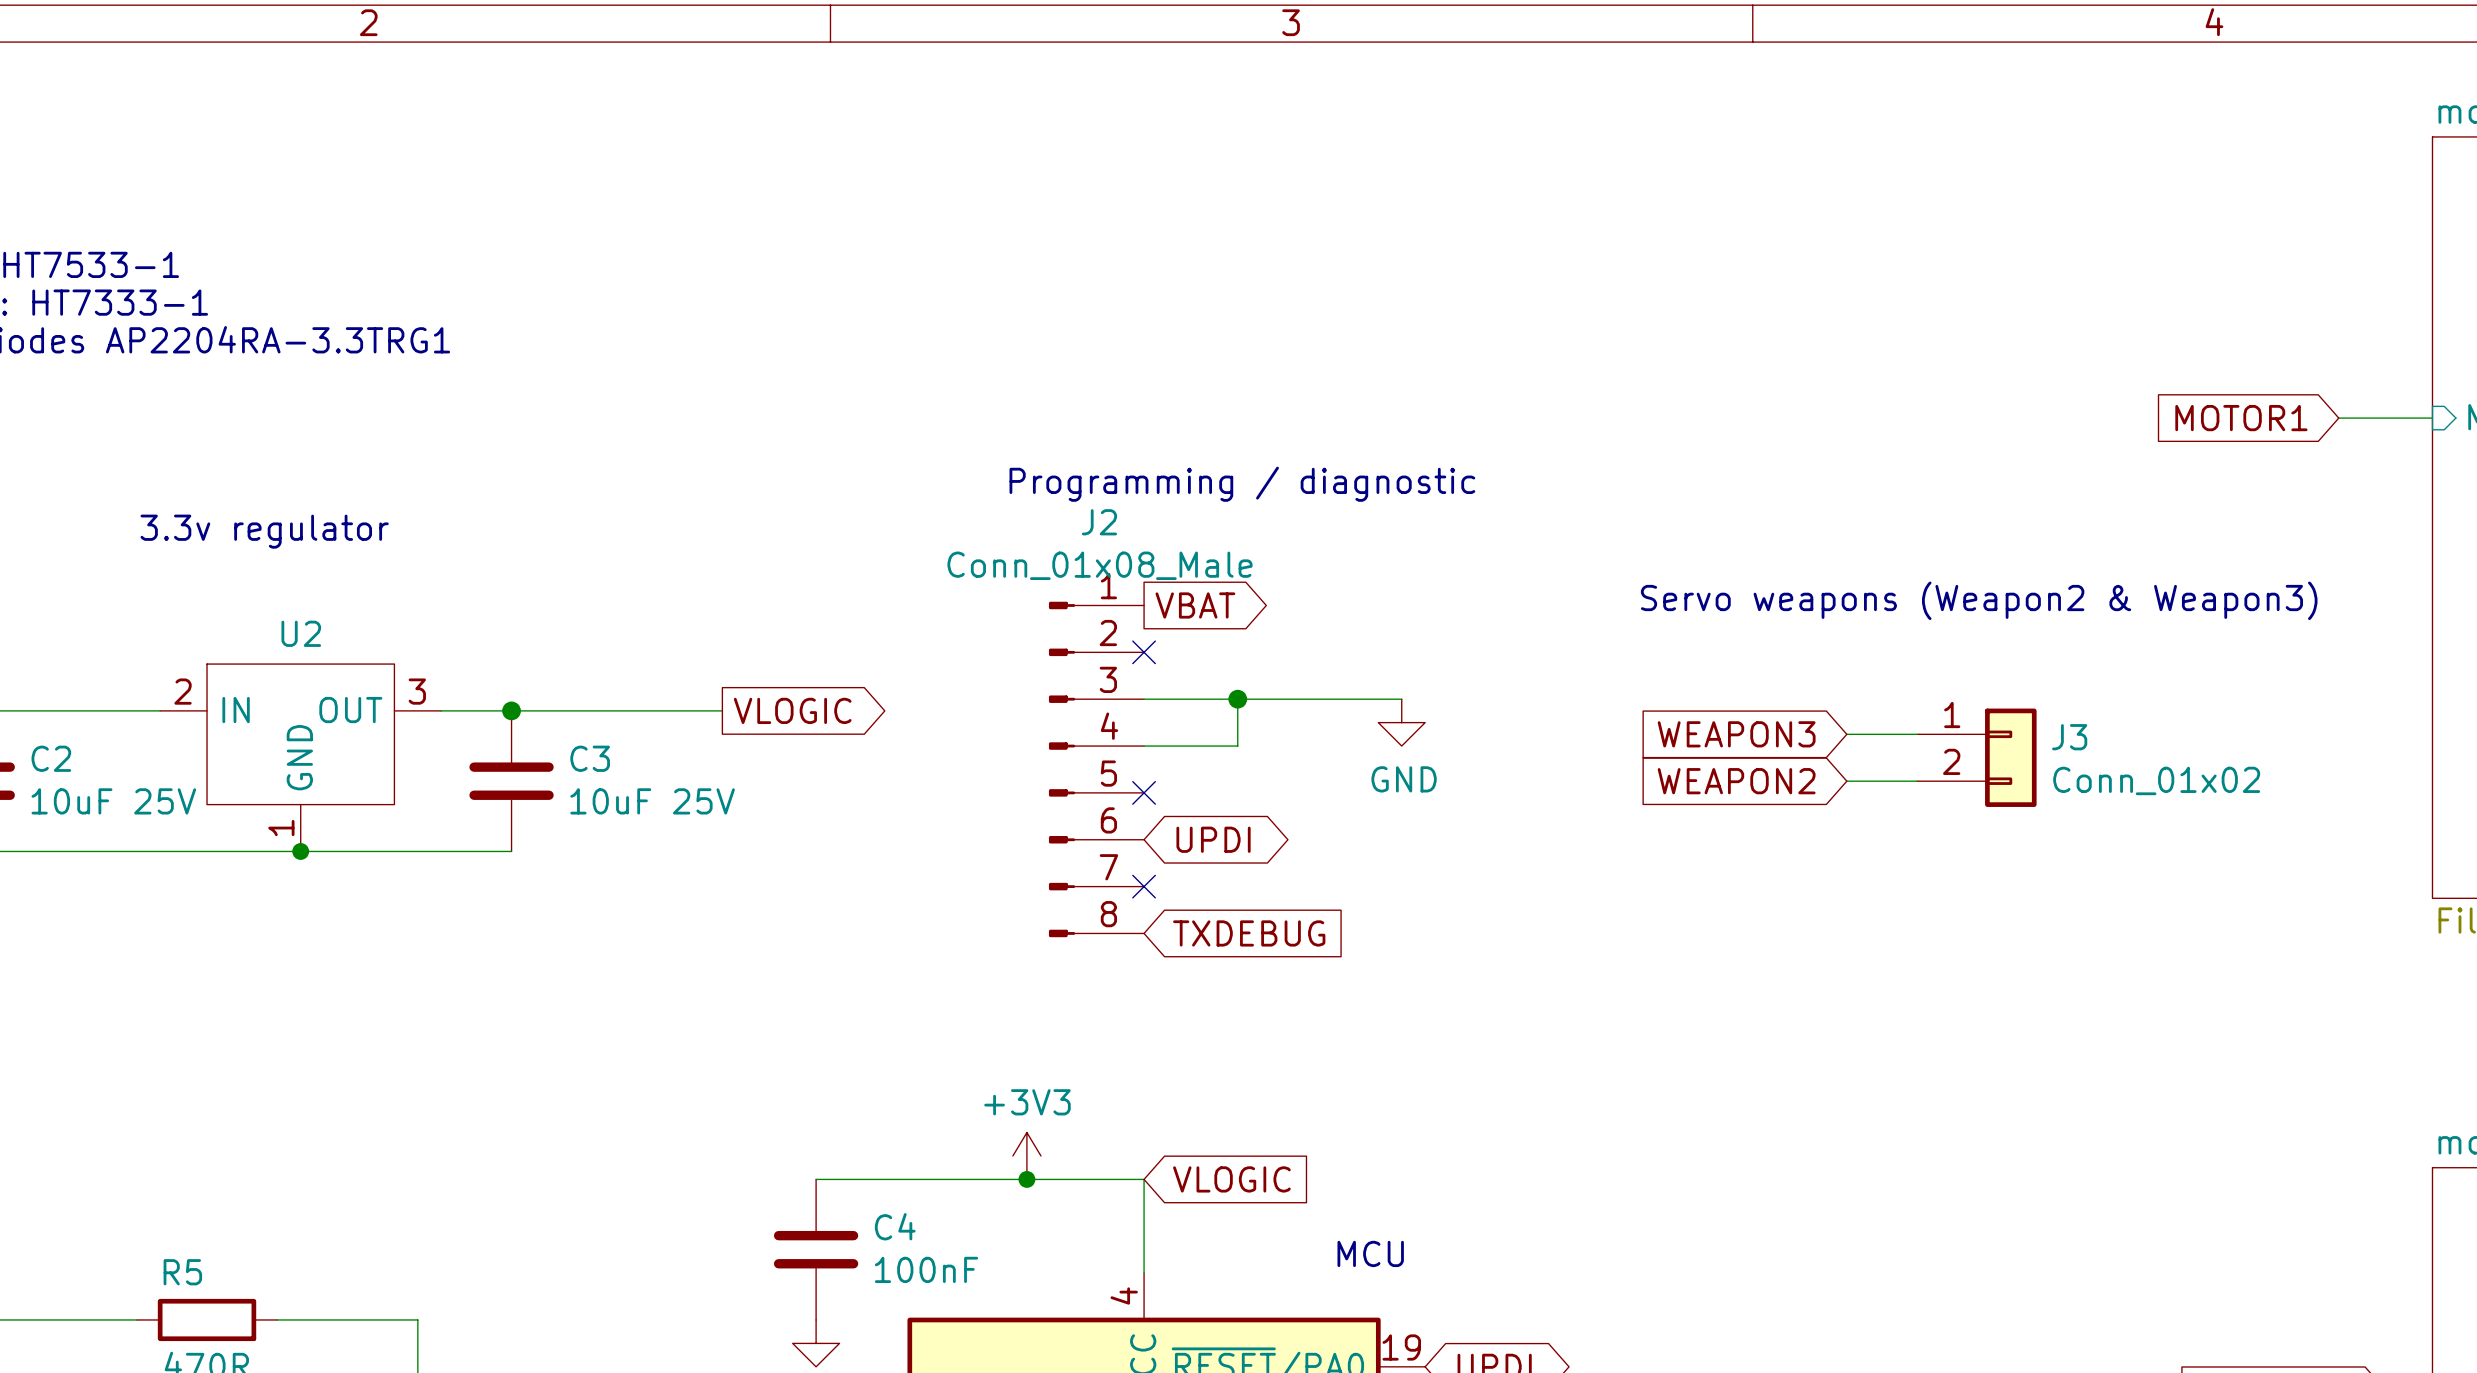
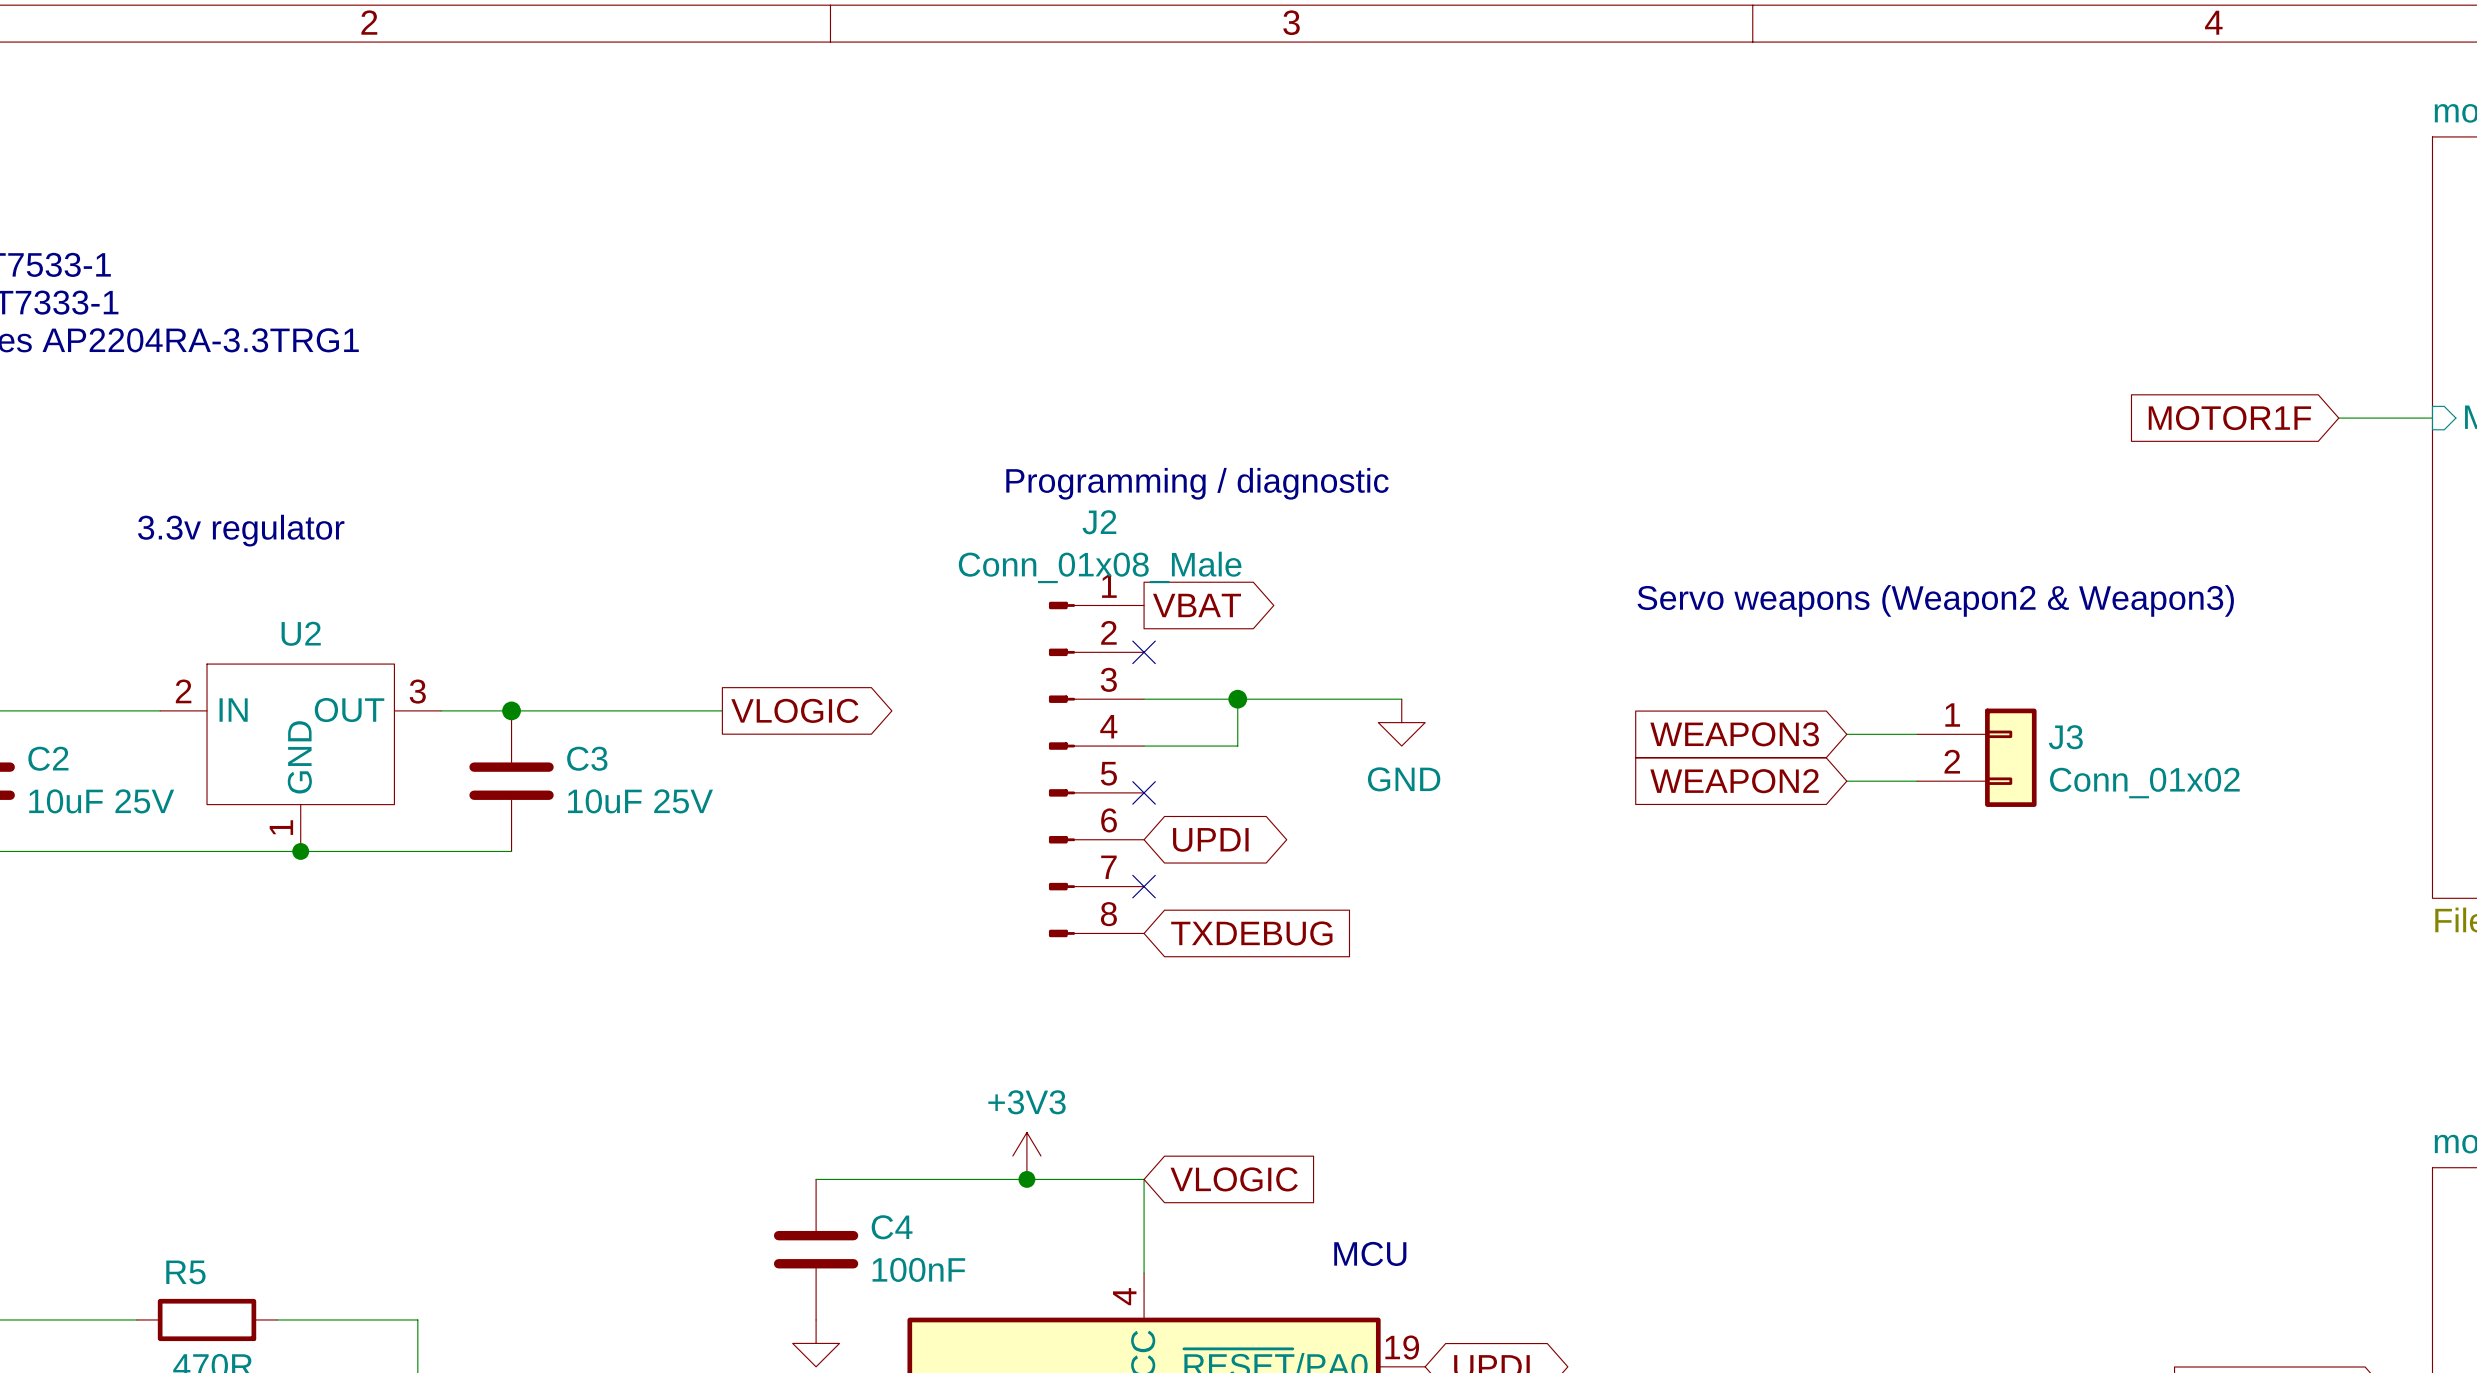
global label: MOTOR1 (2241, 418) -> MOTOR1F (2229, 418)

